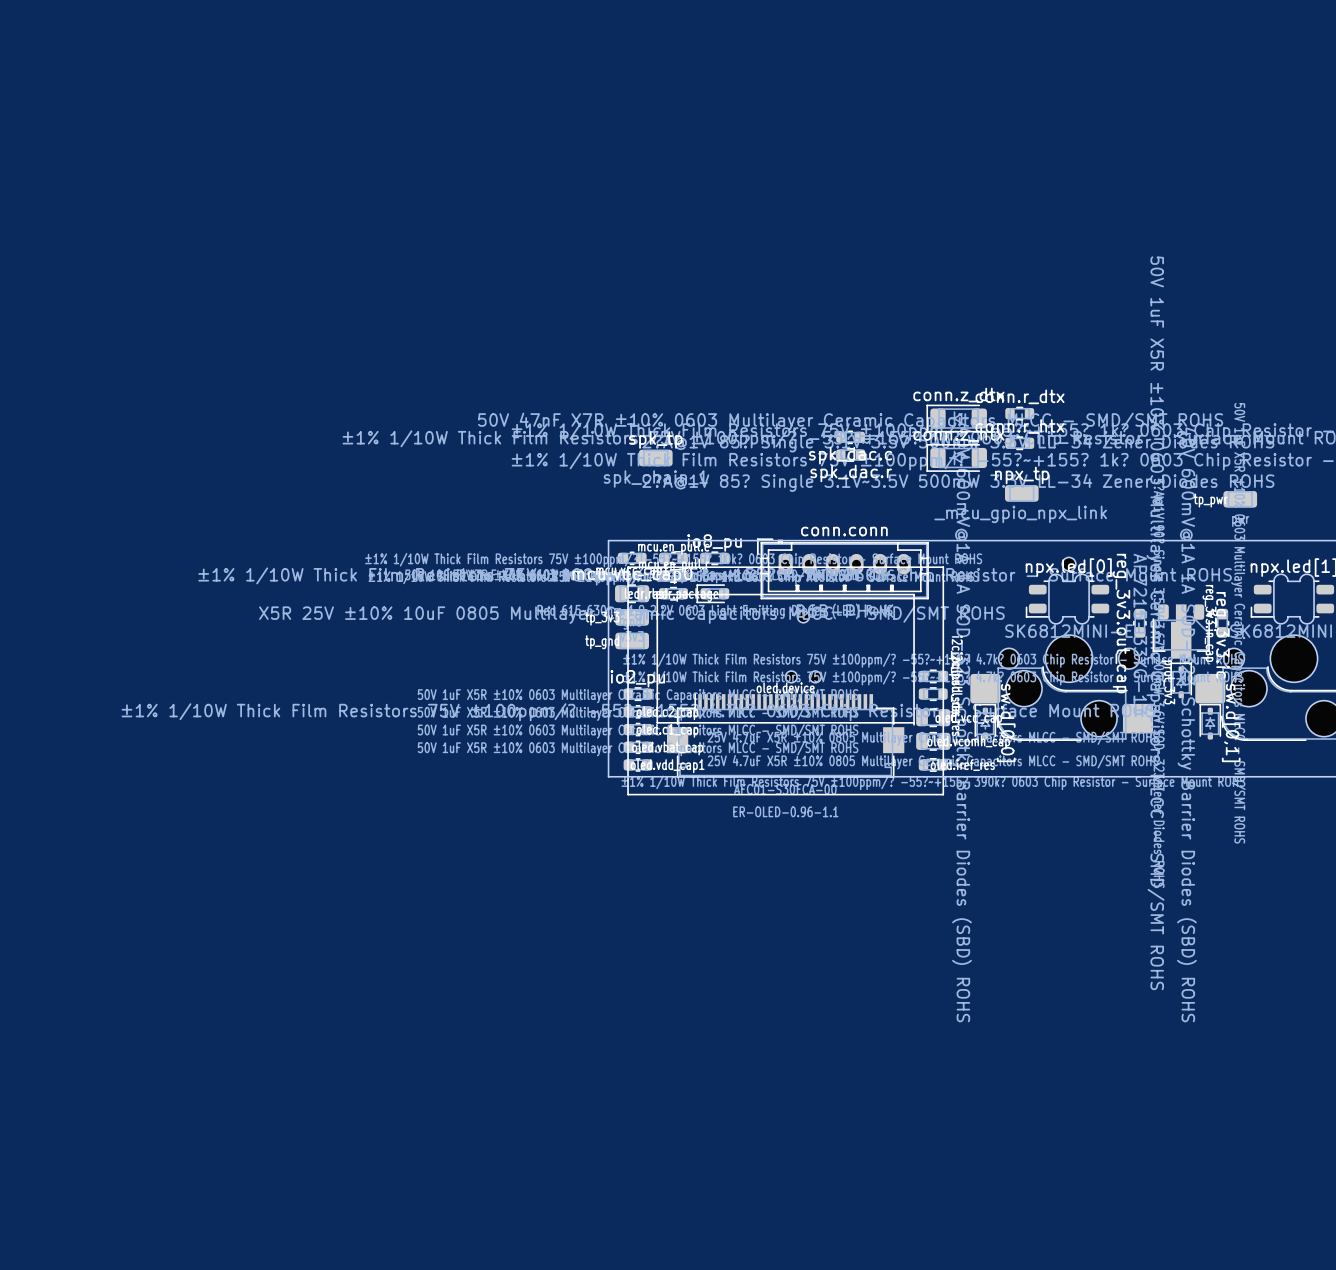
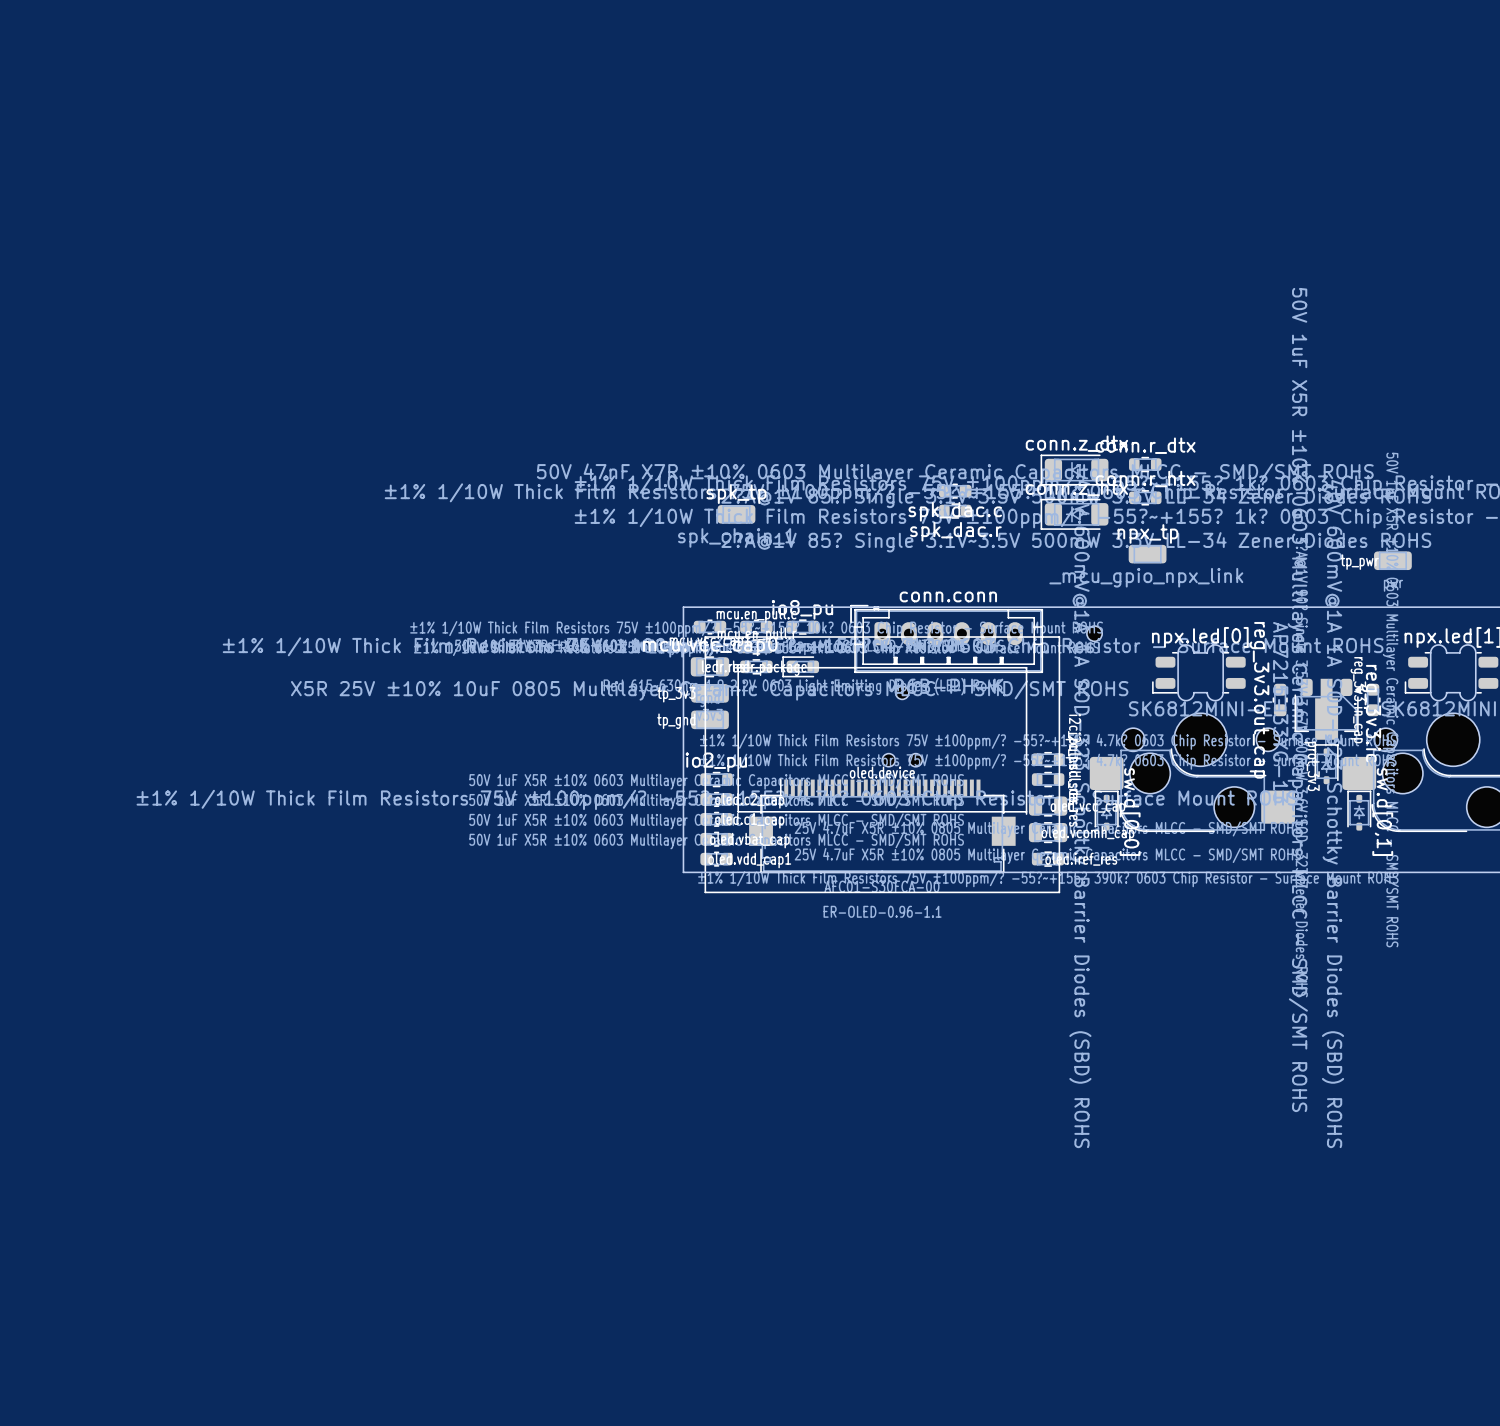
part position: (1069, 564) -> (1094, 633)

